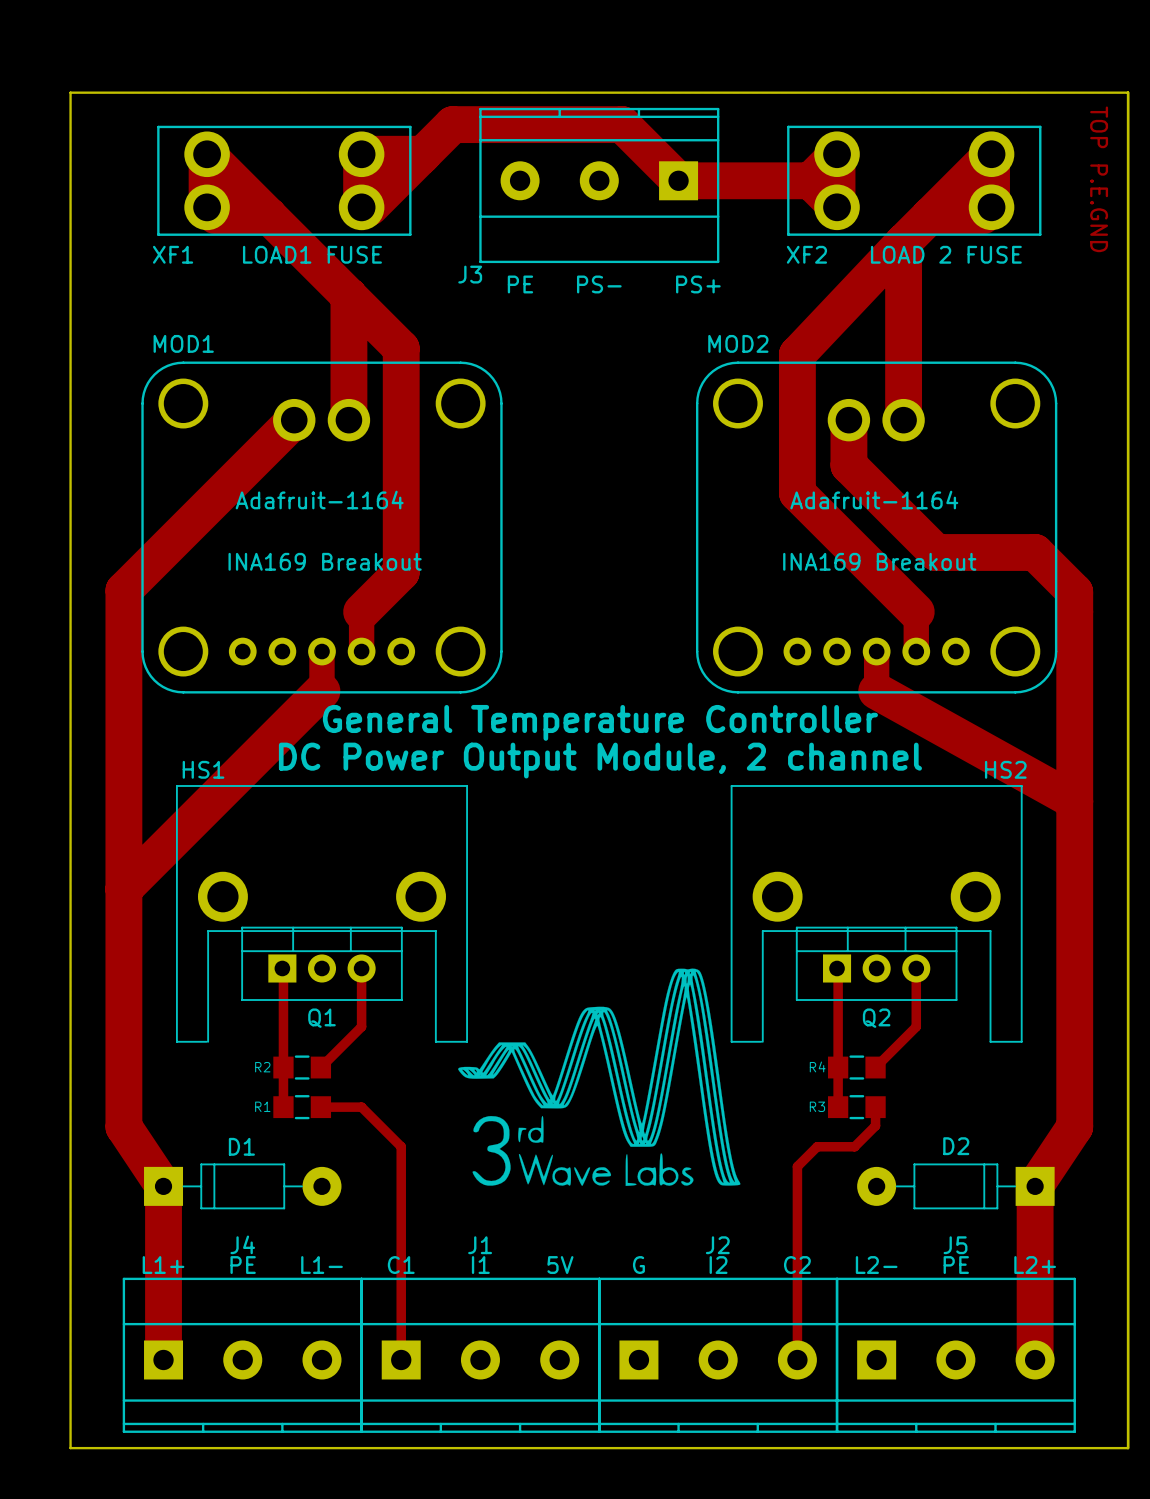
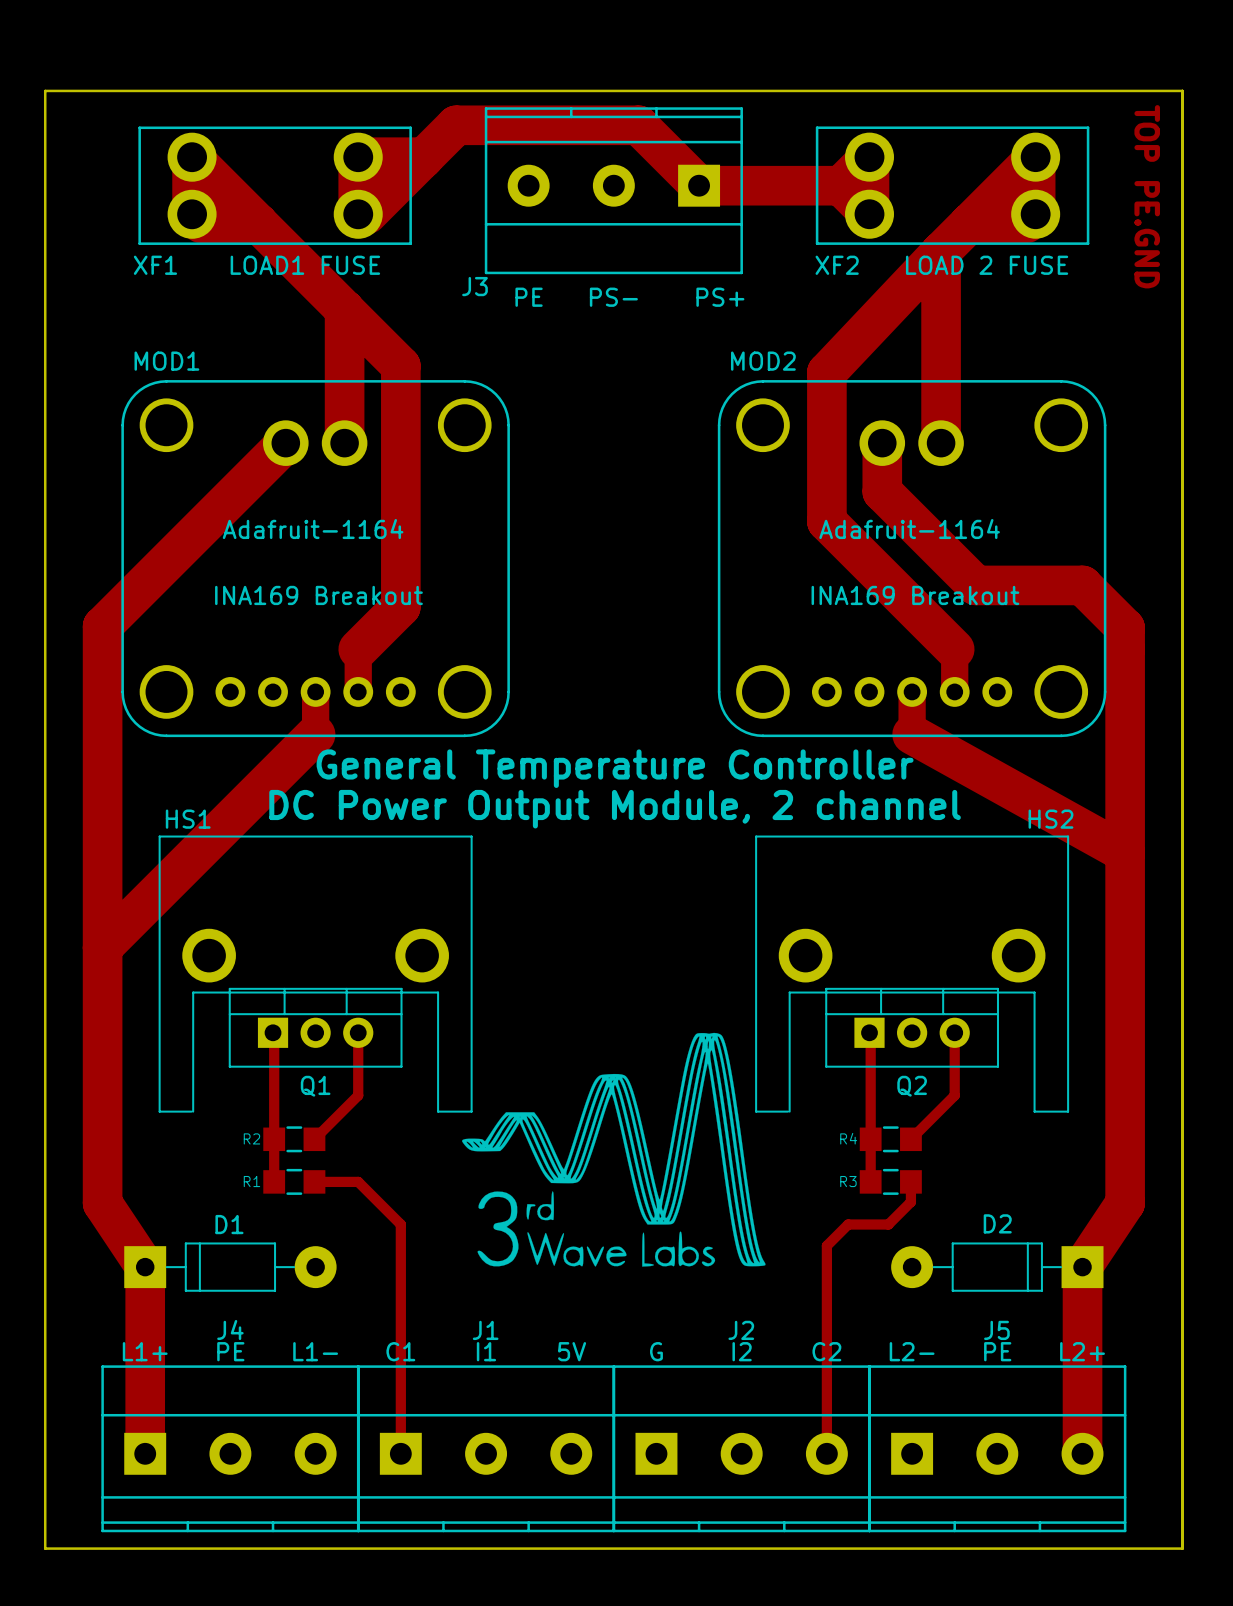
text: TOP P.E.GND (1099, 179) -> TOP PE.GND (1147, 196)

